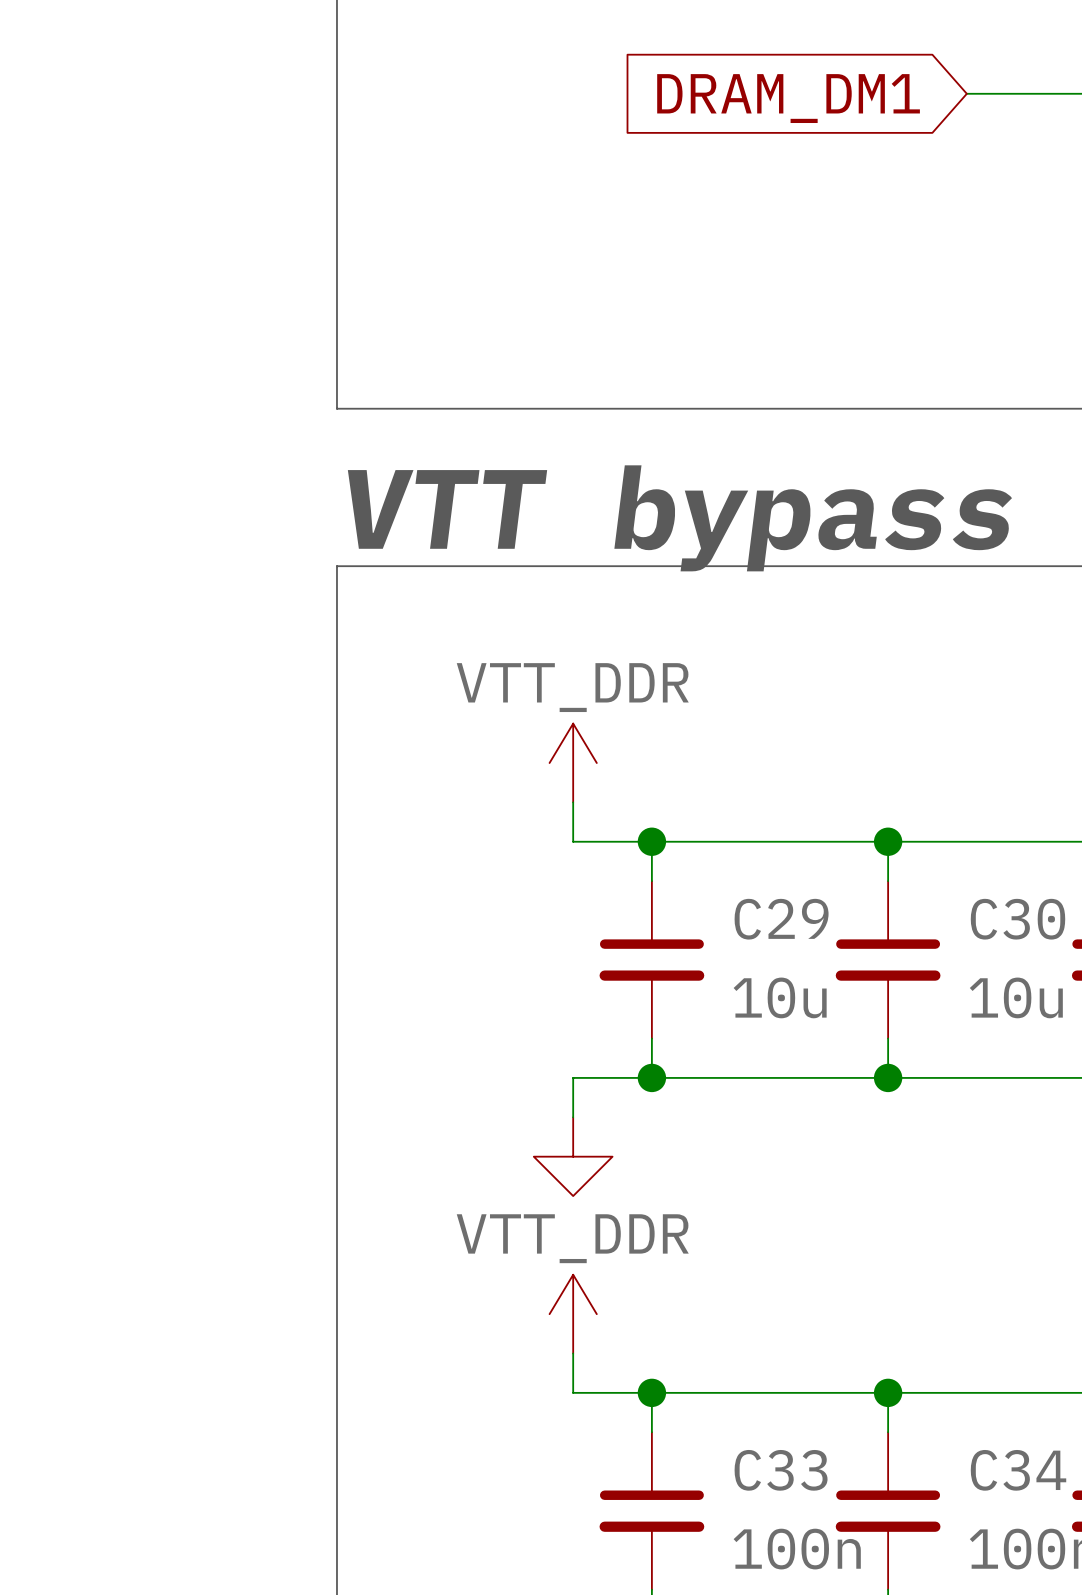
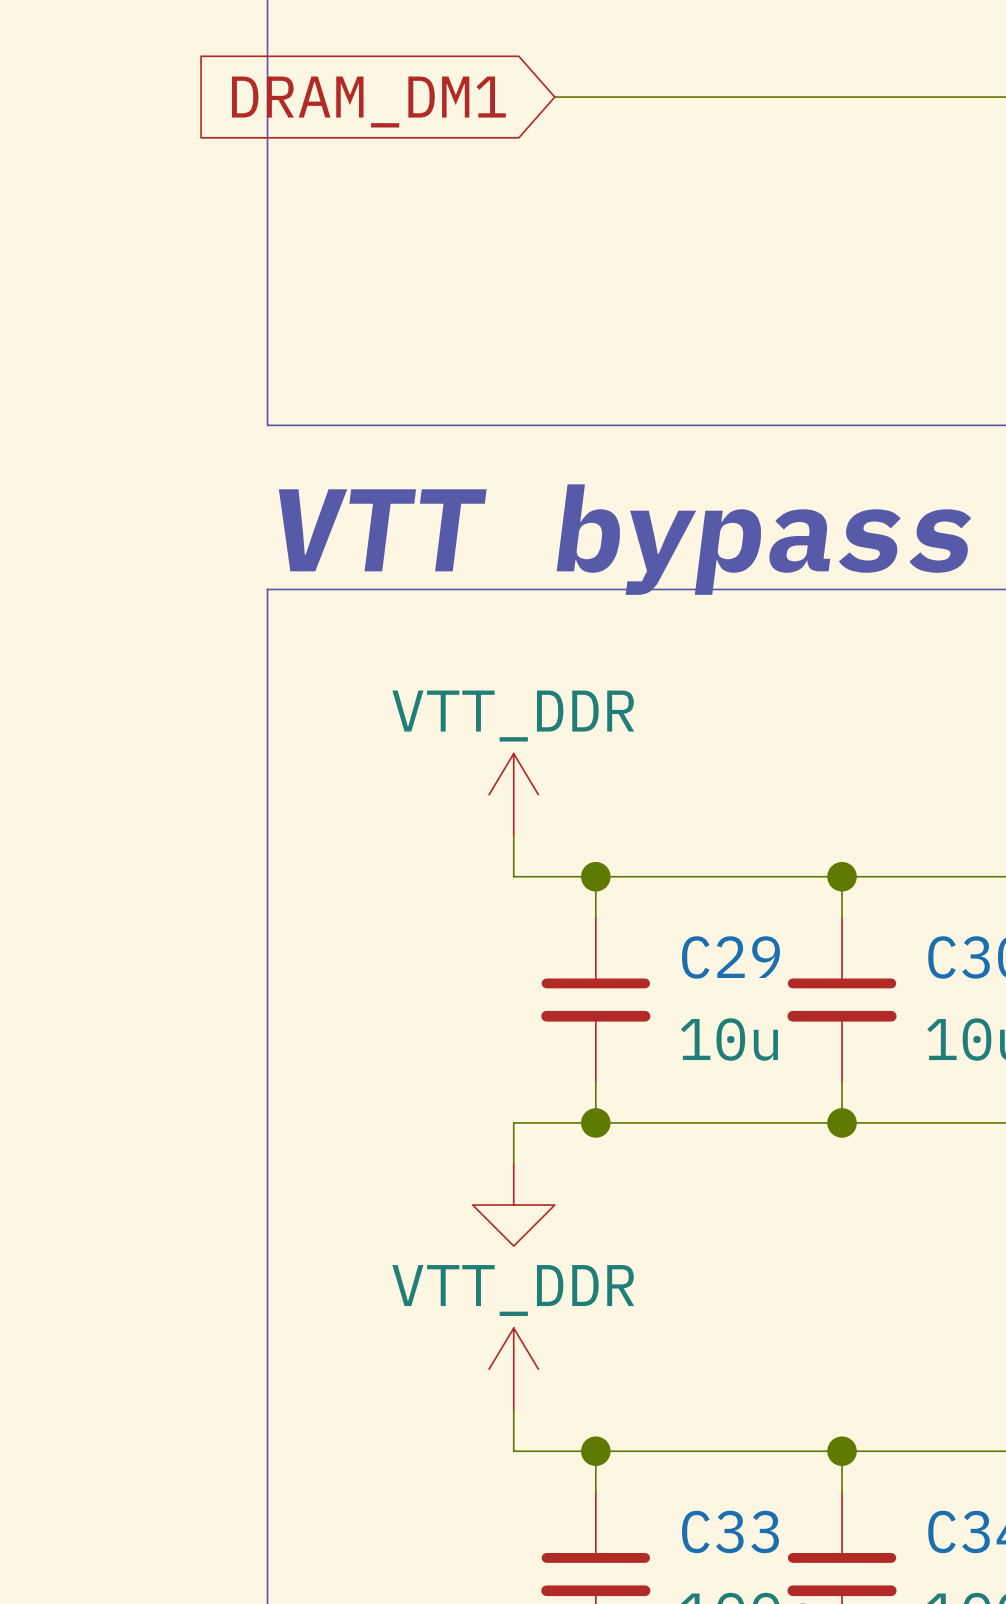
wire: none -> (554, 97) (924, 97)
global label position: DRAM_DM1 (788, 98) -> DRAM_DM1 (368, 102)

